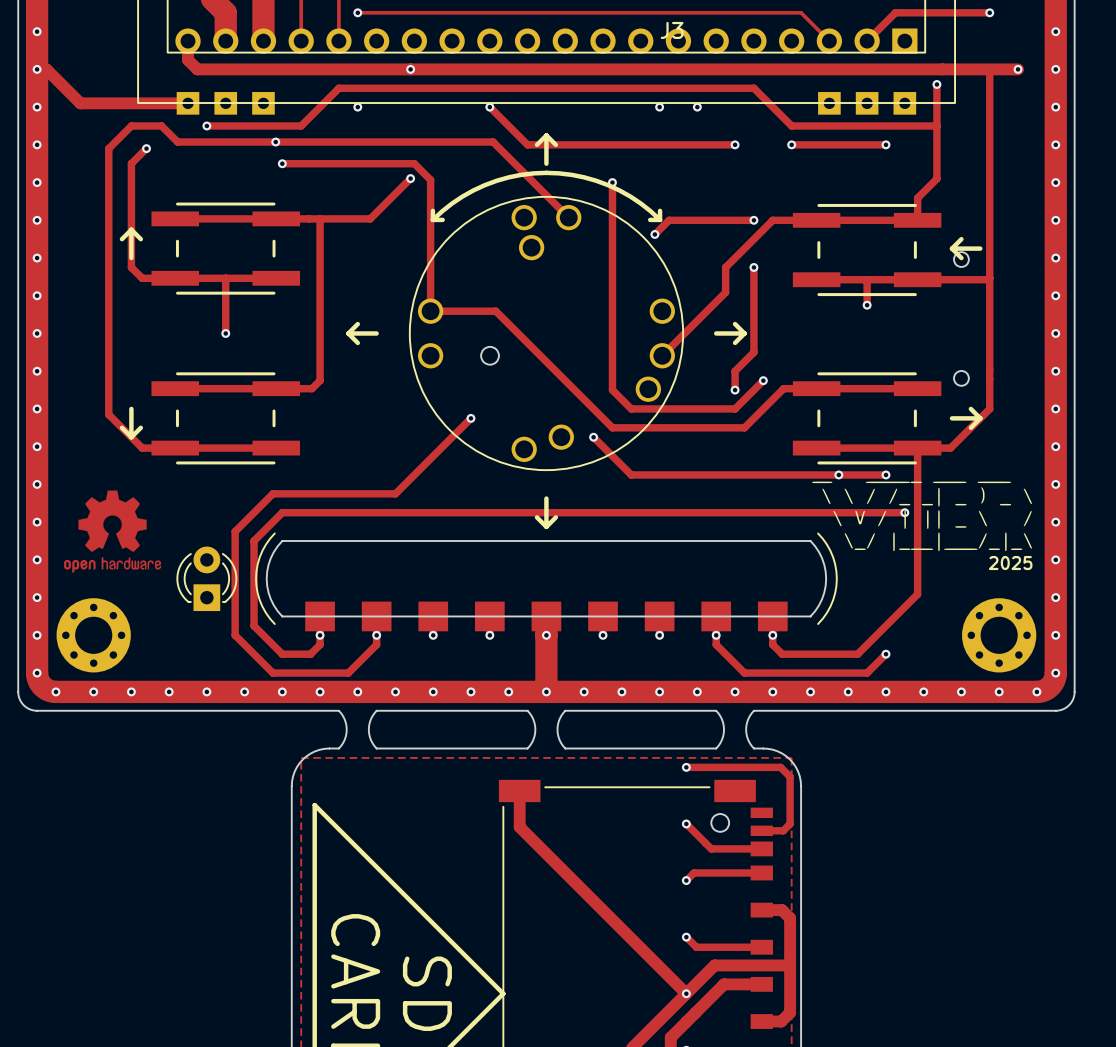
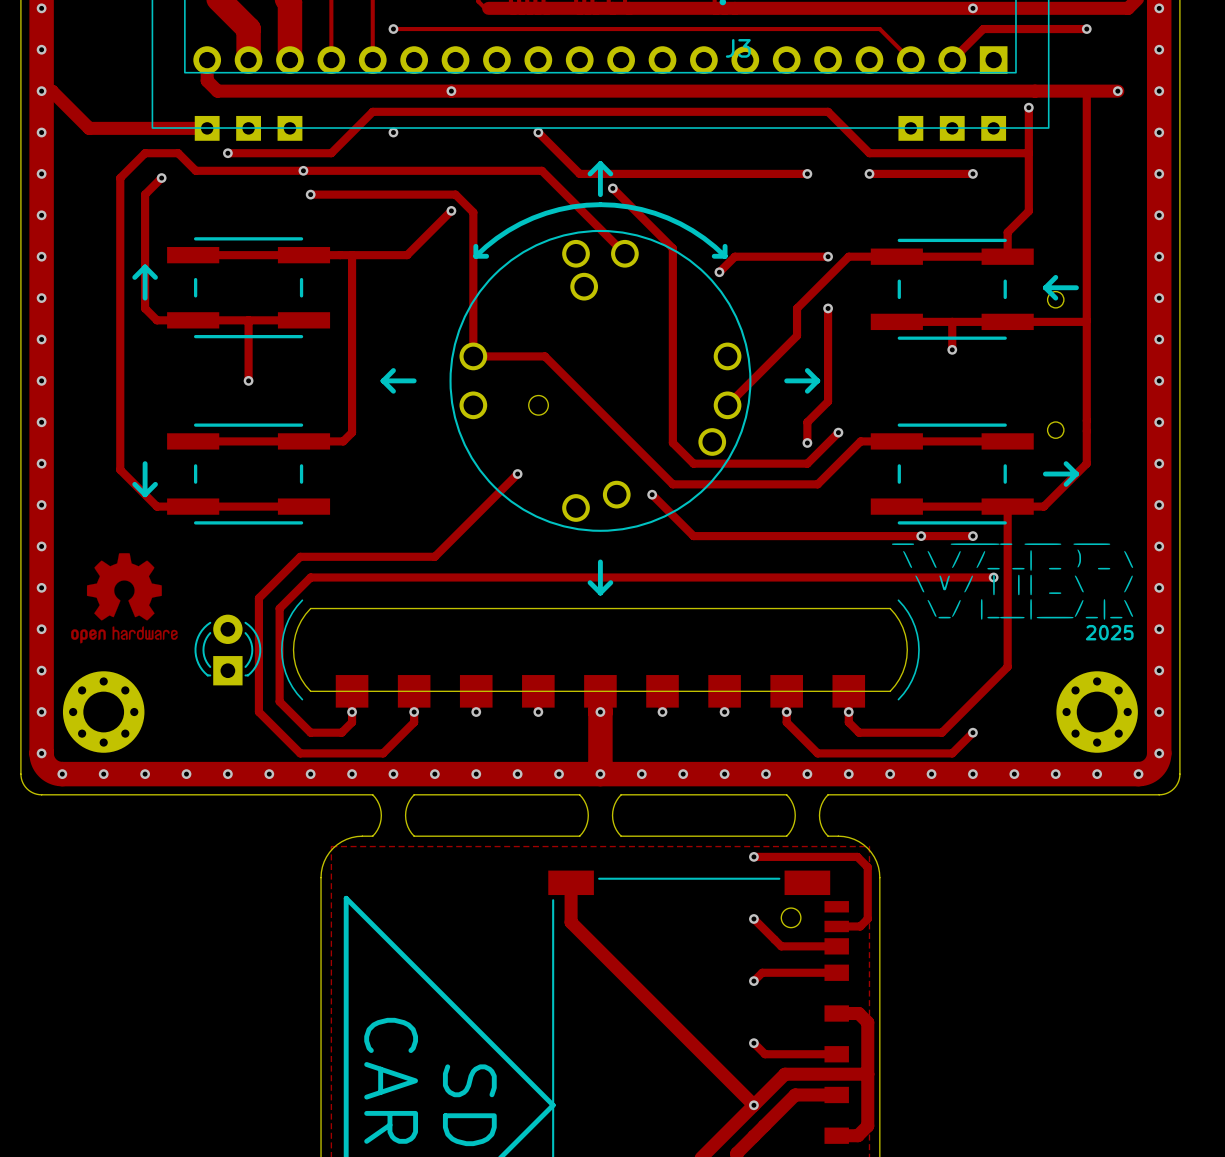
via: (659, 107) -> none
via: (697, 107) -> none
via: none -> (612, 188)
track: (612, 182) (612, 212) -> (612, 188) (672, 248)
via: (612, 182) -> none

